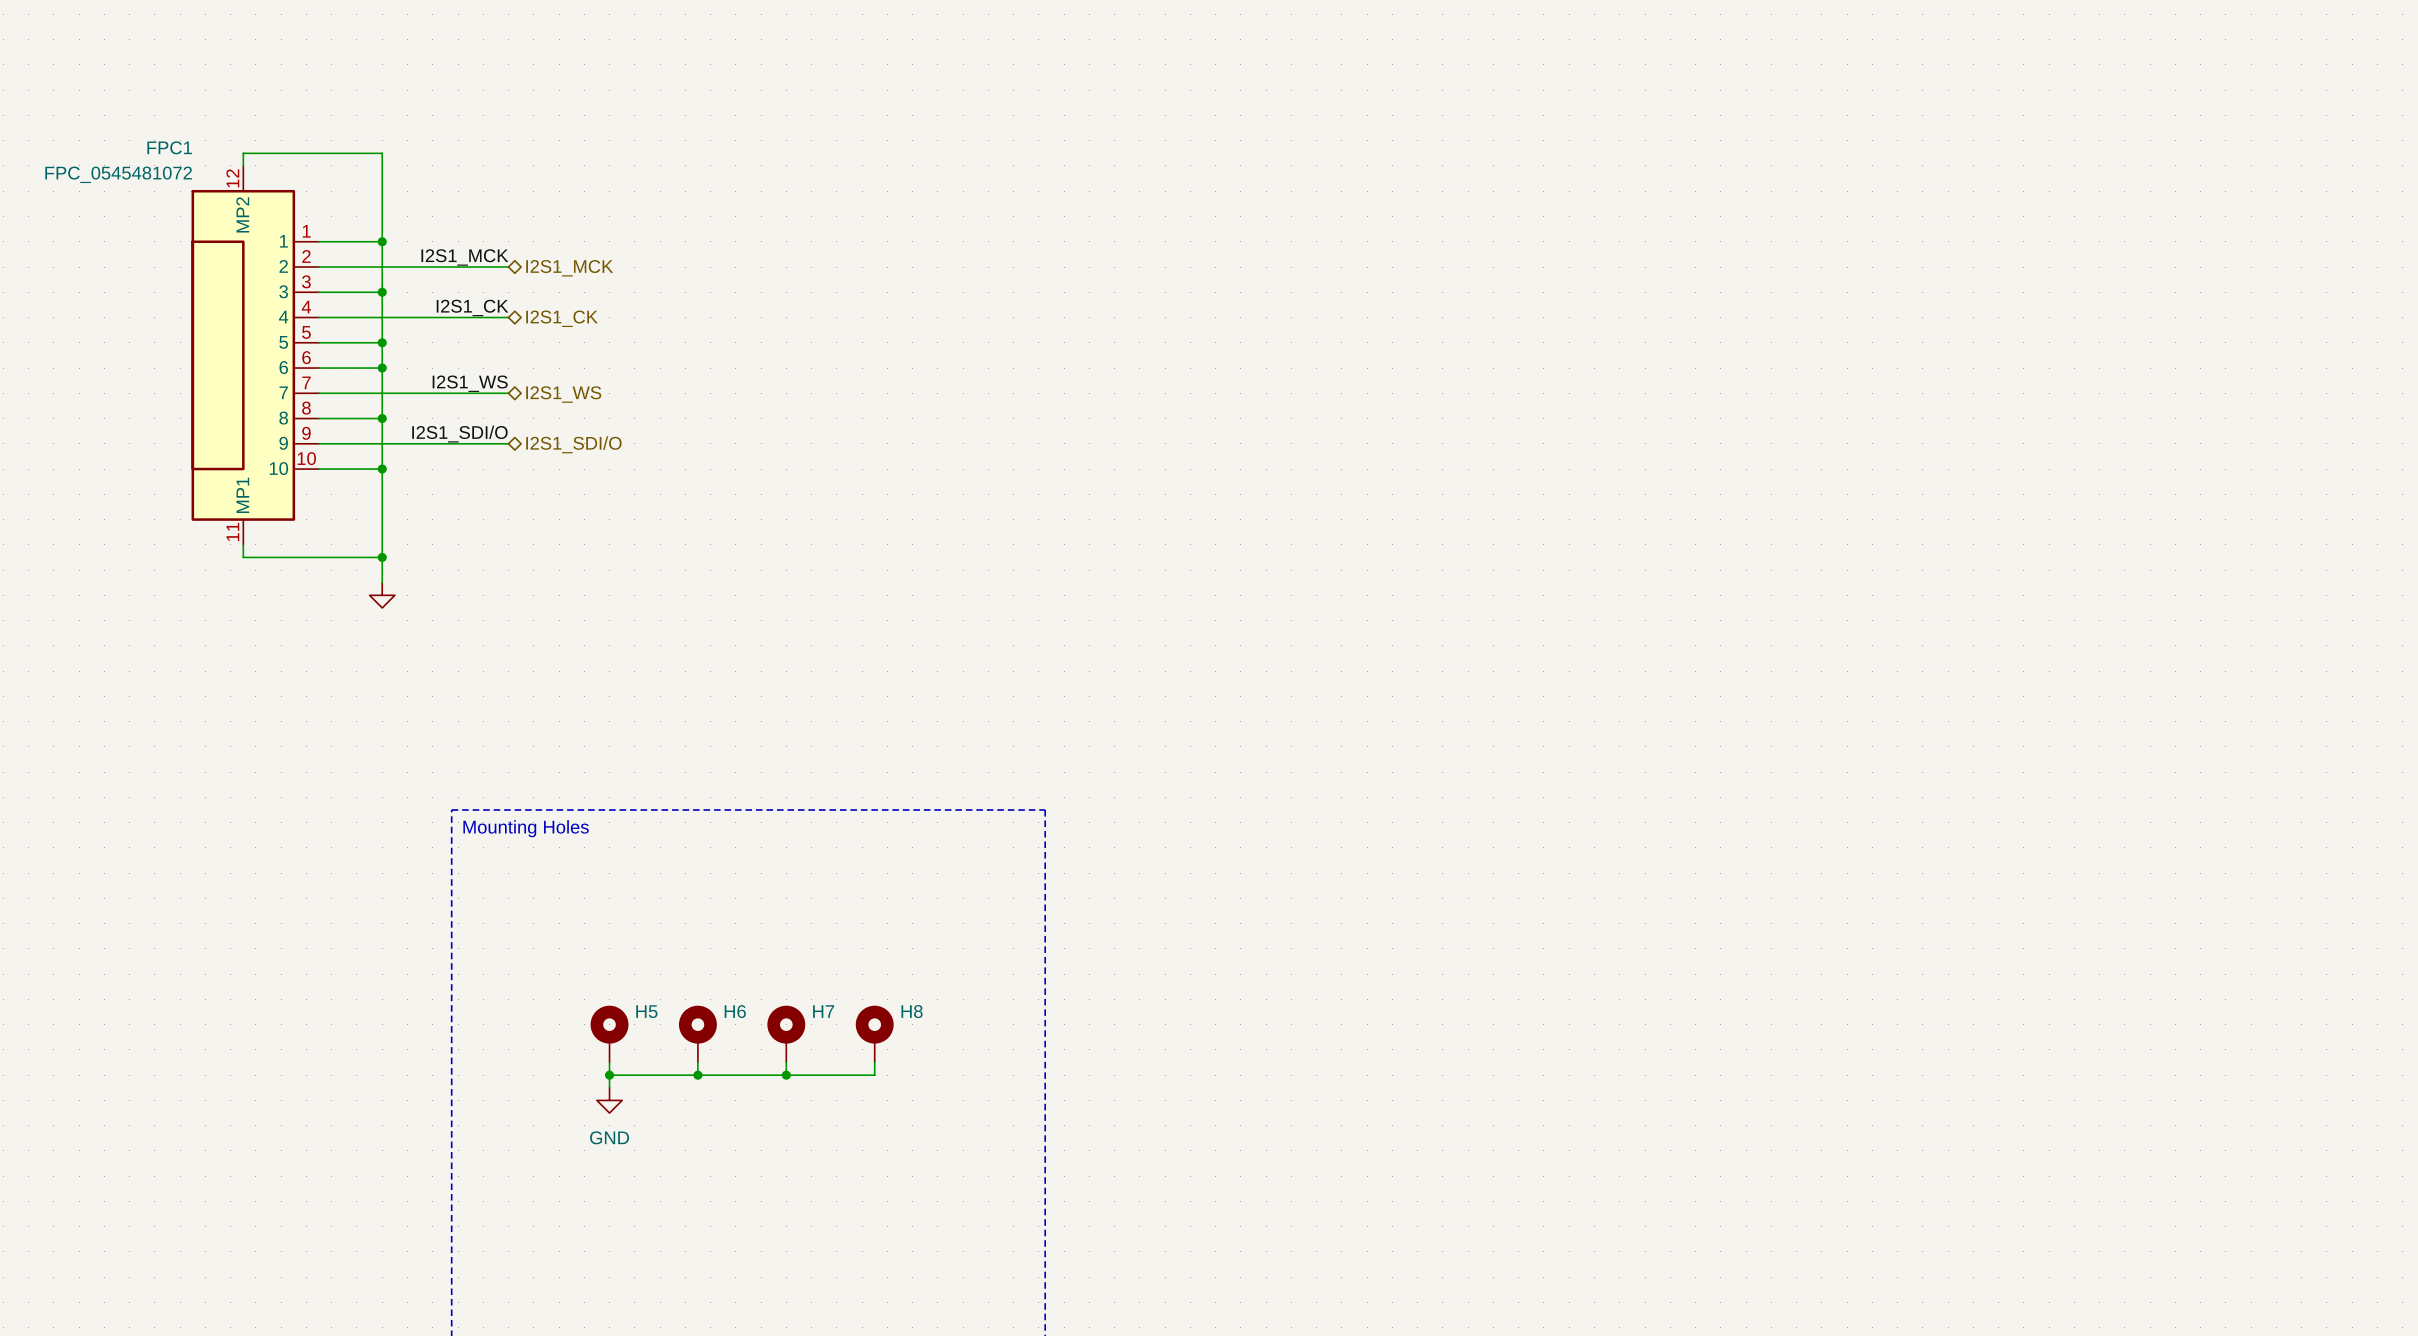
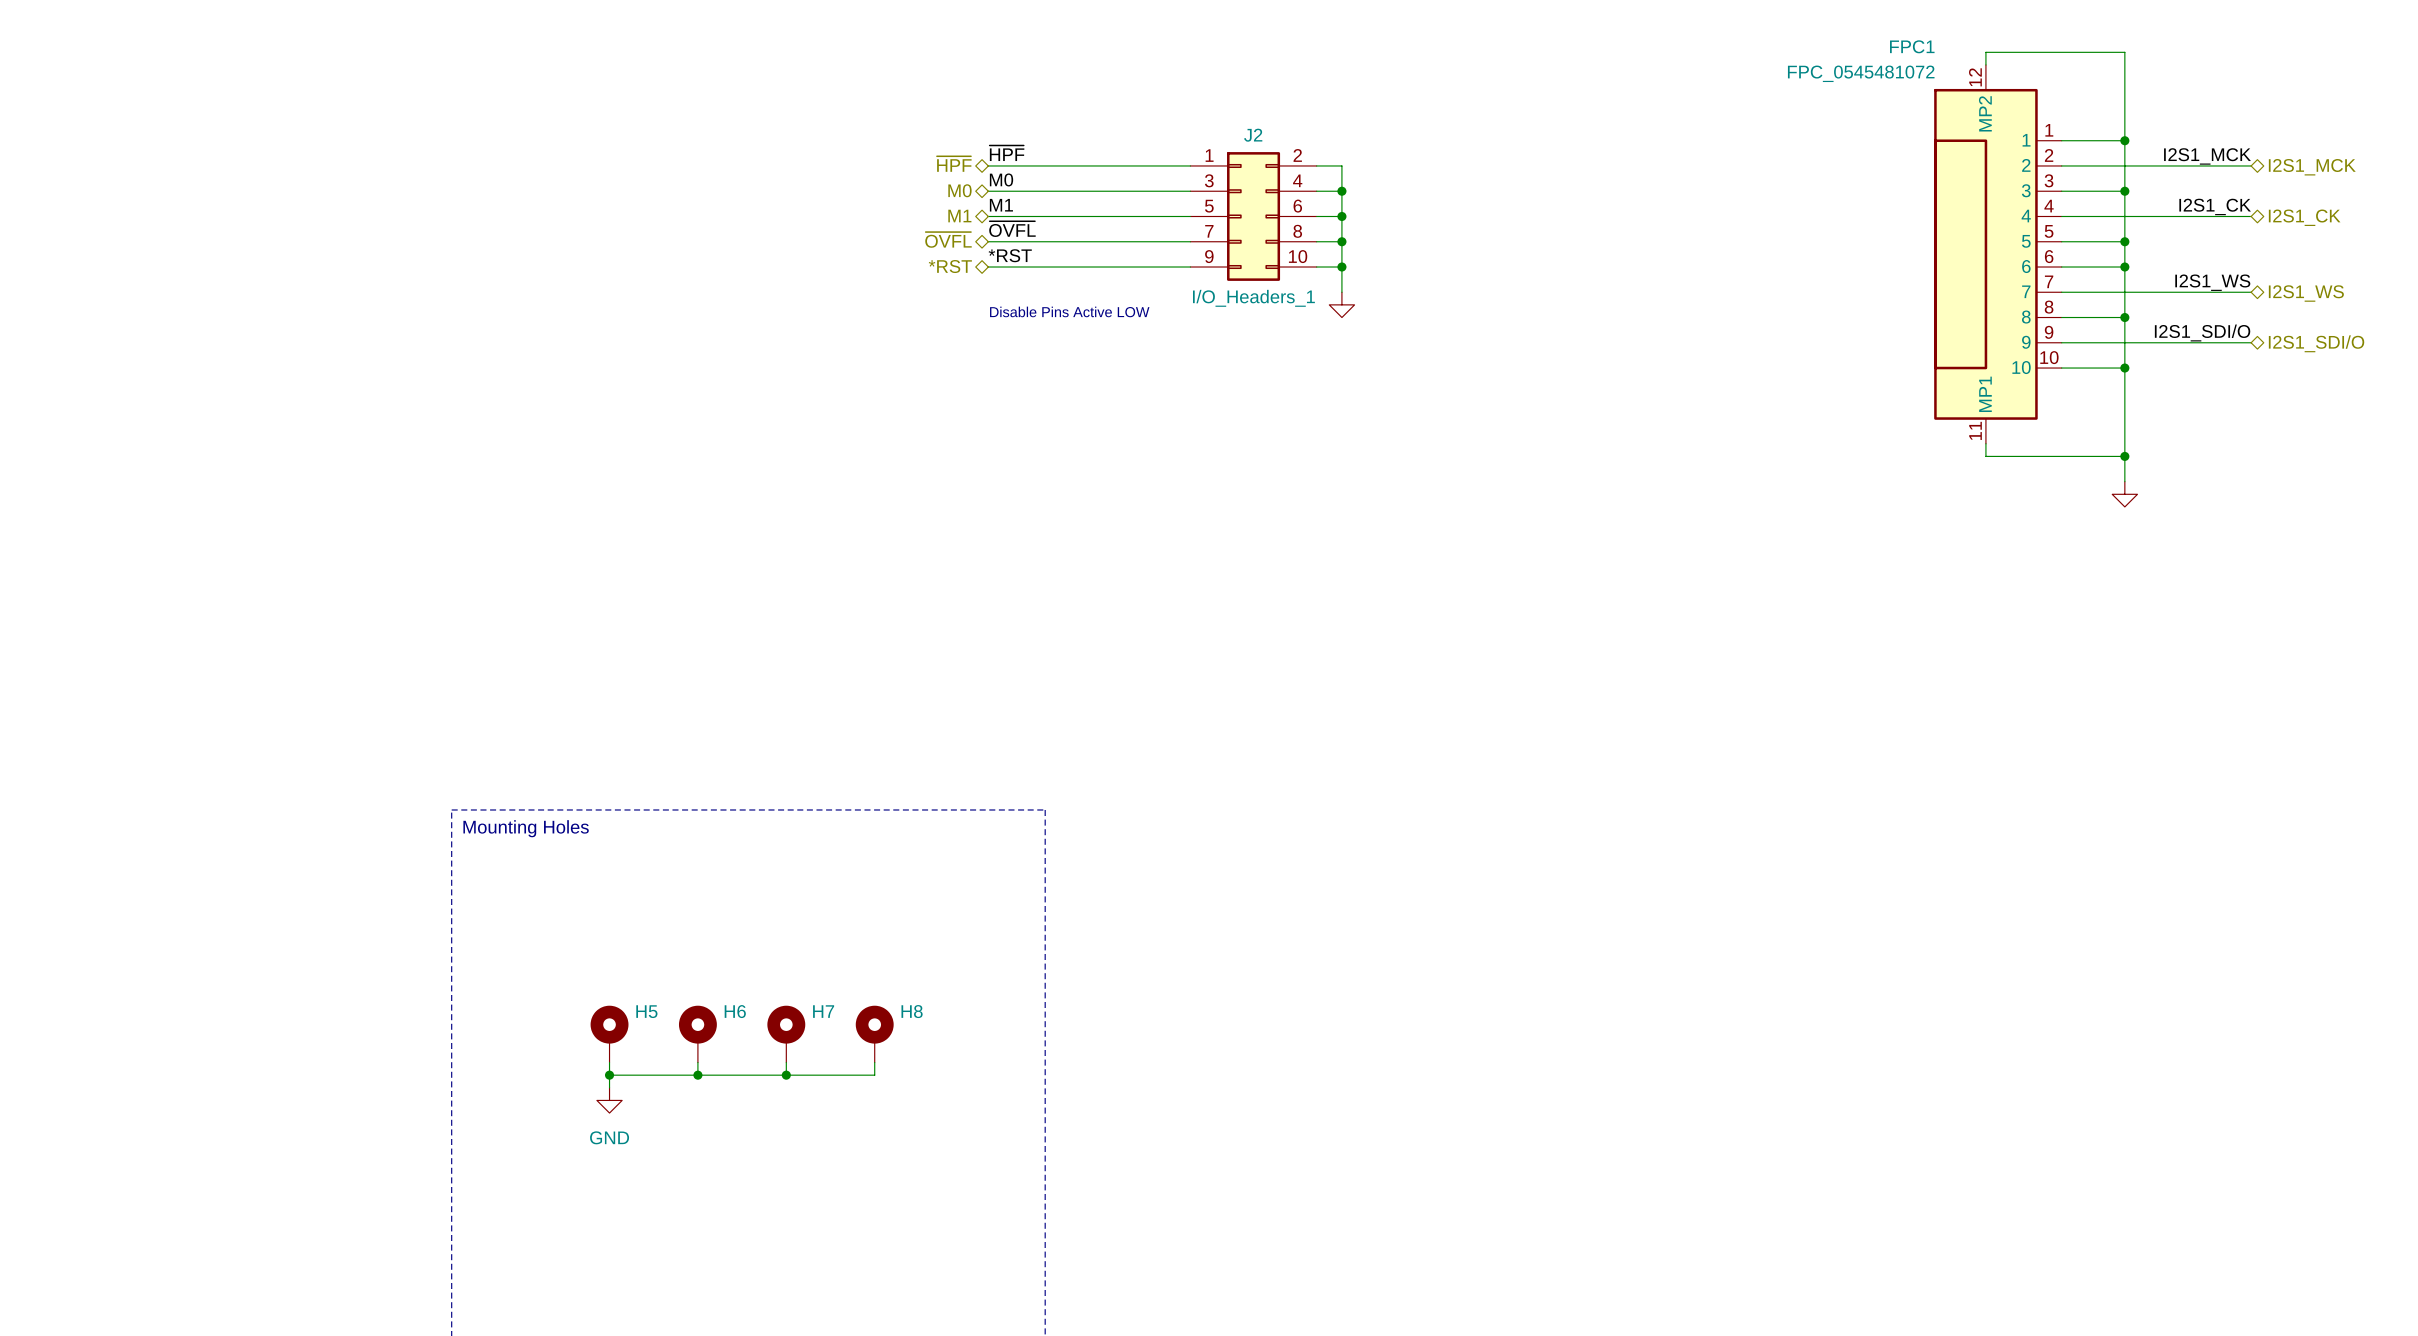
wire: none -> (1985, 64) (1985, 52) (2124, 52) (2124, 481)
wire: none -> (2061, 140) (2124, 140)
junction: none -> (2124, 140)
label: none -> ~{HPF} (1006, 153)
label: none -> I2S1_MCK (2207, 156)
hierarchical label: none -> ~{HPF} (954, 164)
wire: (243, 165) (243, 153) (382, 153) (382, 582) -> none
wire: none -> (988, 165) (1190, 165)
wire: none -> (1316, 165) (1341, 165) (1341, 292)
wire: none -> (2061, 165) (2251, 165)
hierarchical label: none -> I2S1_MCK (2312, 167)
label: none -> M0 (1001, 179)
hierarchical label: none -> M0 (959, 190)
wire: none -> (988, 191) (1190, 191)
wire: none -> (1316, 191) (1341, 191)
junction: none -> (1341, 191)
wire: none -> (2061, 191) (2124, 191)
junction: none -> (2124, 191)
label: none -> M1 (1001, 205)
label: none -> I2S1_CK (2215, 206)
hierarchical label: none -> M1 (959, 216)
wire: none -> (988, 216) (1190, 216)
J2: none -> I/O_Headers_1 (1253, 216)
wire: none -> (1316, 216) (1341, 216)
junction: none -> (1341, 216)
wire: none -> (2061, 216) (2251, 216)
hierarchical label: none -> I2S1_CK (2304, 217)
label: none -> ~{OVFL} (1012, 229)
hierarchical label: none -> ~{OVFL} (948, 239)
wire: (319, 241) (382, 241) -> none
junction: (382, 241) -> none
wire: none -> (988, 241) (1190, 241)
wire: none -> (1316, 241) (1341, 241)
junction: none -> (1341, 241)
wire: none -> (2061, 241) (2124, 241)
junction: none -> (2124, 241)
label: none -> *RST (1010, 255)
label: I2S1_MCK (464, 257) -> none
hierarchical label: none -> *RST (950, 266)
wire: (319, 267) (508, 267) -> none
wire: none -> (988, 267) (1190, 267)
wire: none -> (1316, 267) (1341, 267)
junction: none -> (1341, 267)
wire: none -> (2061, 267) (2124, 267)
junction: none -> (2124, 267)
hierarchical label: I2S1_MCK (569, 268) -> none
label: none -> I2S1_WS (2212, 282)
wire: (319, 292) (382, 292) -> none
junction: (382, 292) -> none
wire: none -> (2061, 292) (2251, 292)
hierarchical label: none -> I2S1_WS (2306, 293)
power symbol: none -> (1341, 304)
label: I2S1_CK (472, 307) -> none
text: none -> Disable Pins Active LOW (1069, 311)
wire: (319, 317) (508, 317) -> none
wire: none -> (2061, 317) (2124, 317)
junction: none -> (2124, 317)
hierarchical label: I2S1_CK (562, 318) -> none
label: none -> I2S1_SDI/O (2202, 332)
wire: (319, 342) (382, 342) -> none
junction: (382, 342) -> none
wire: none -> (2061, 342) (2251, 342)
hierarchical label: none -> I2S1_SDI/O (2316, 343)
FPC1 position: (255, 355) -> (1997, 254)
wire: (319, 368) (382, 368) -> none
junction: (382, 368) -> none
wire: none -> (2061, 368) (2124, 368)
junction: none -> (2124, 368)
label: I2S1_WS (470, 383) -> none
wire: (319, 393) (508, 393) -> none
hierarchical label: I2S1_WS (563, 394) -> none
wire: (319, 418) (382, 418) -> none
junction: (382, 418) -> none
label: I2S1_SDI/O (459, 434) -> none
wire: (319, 443) (508, 443) -> none
wire: none -> (1985, 443) (1985, 456) (2124, 456)
hierarchical label: I2S1_SDI/O (573, 444) -> none
junction: none -> (2124, 456)
wire: (319, 469) (382, 469) -> none
junction: (382, 469) -> none
power symbol: none -> (2124, 494)
wire: (243, 544) (243, 557) (382, 557) -> none
junction: (382, 557) -> none
power symbol: (382, 595) -> none

